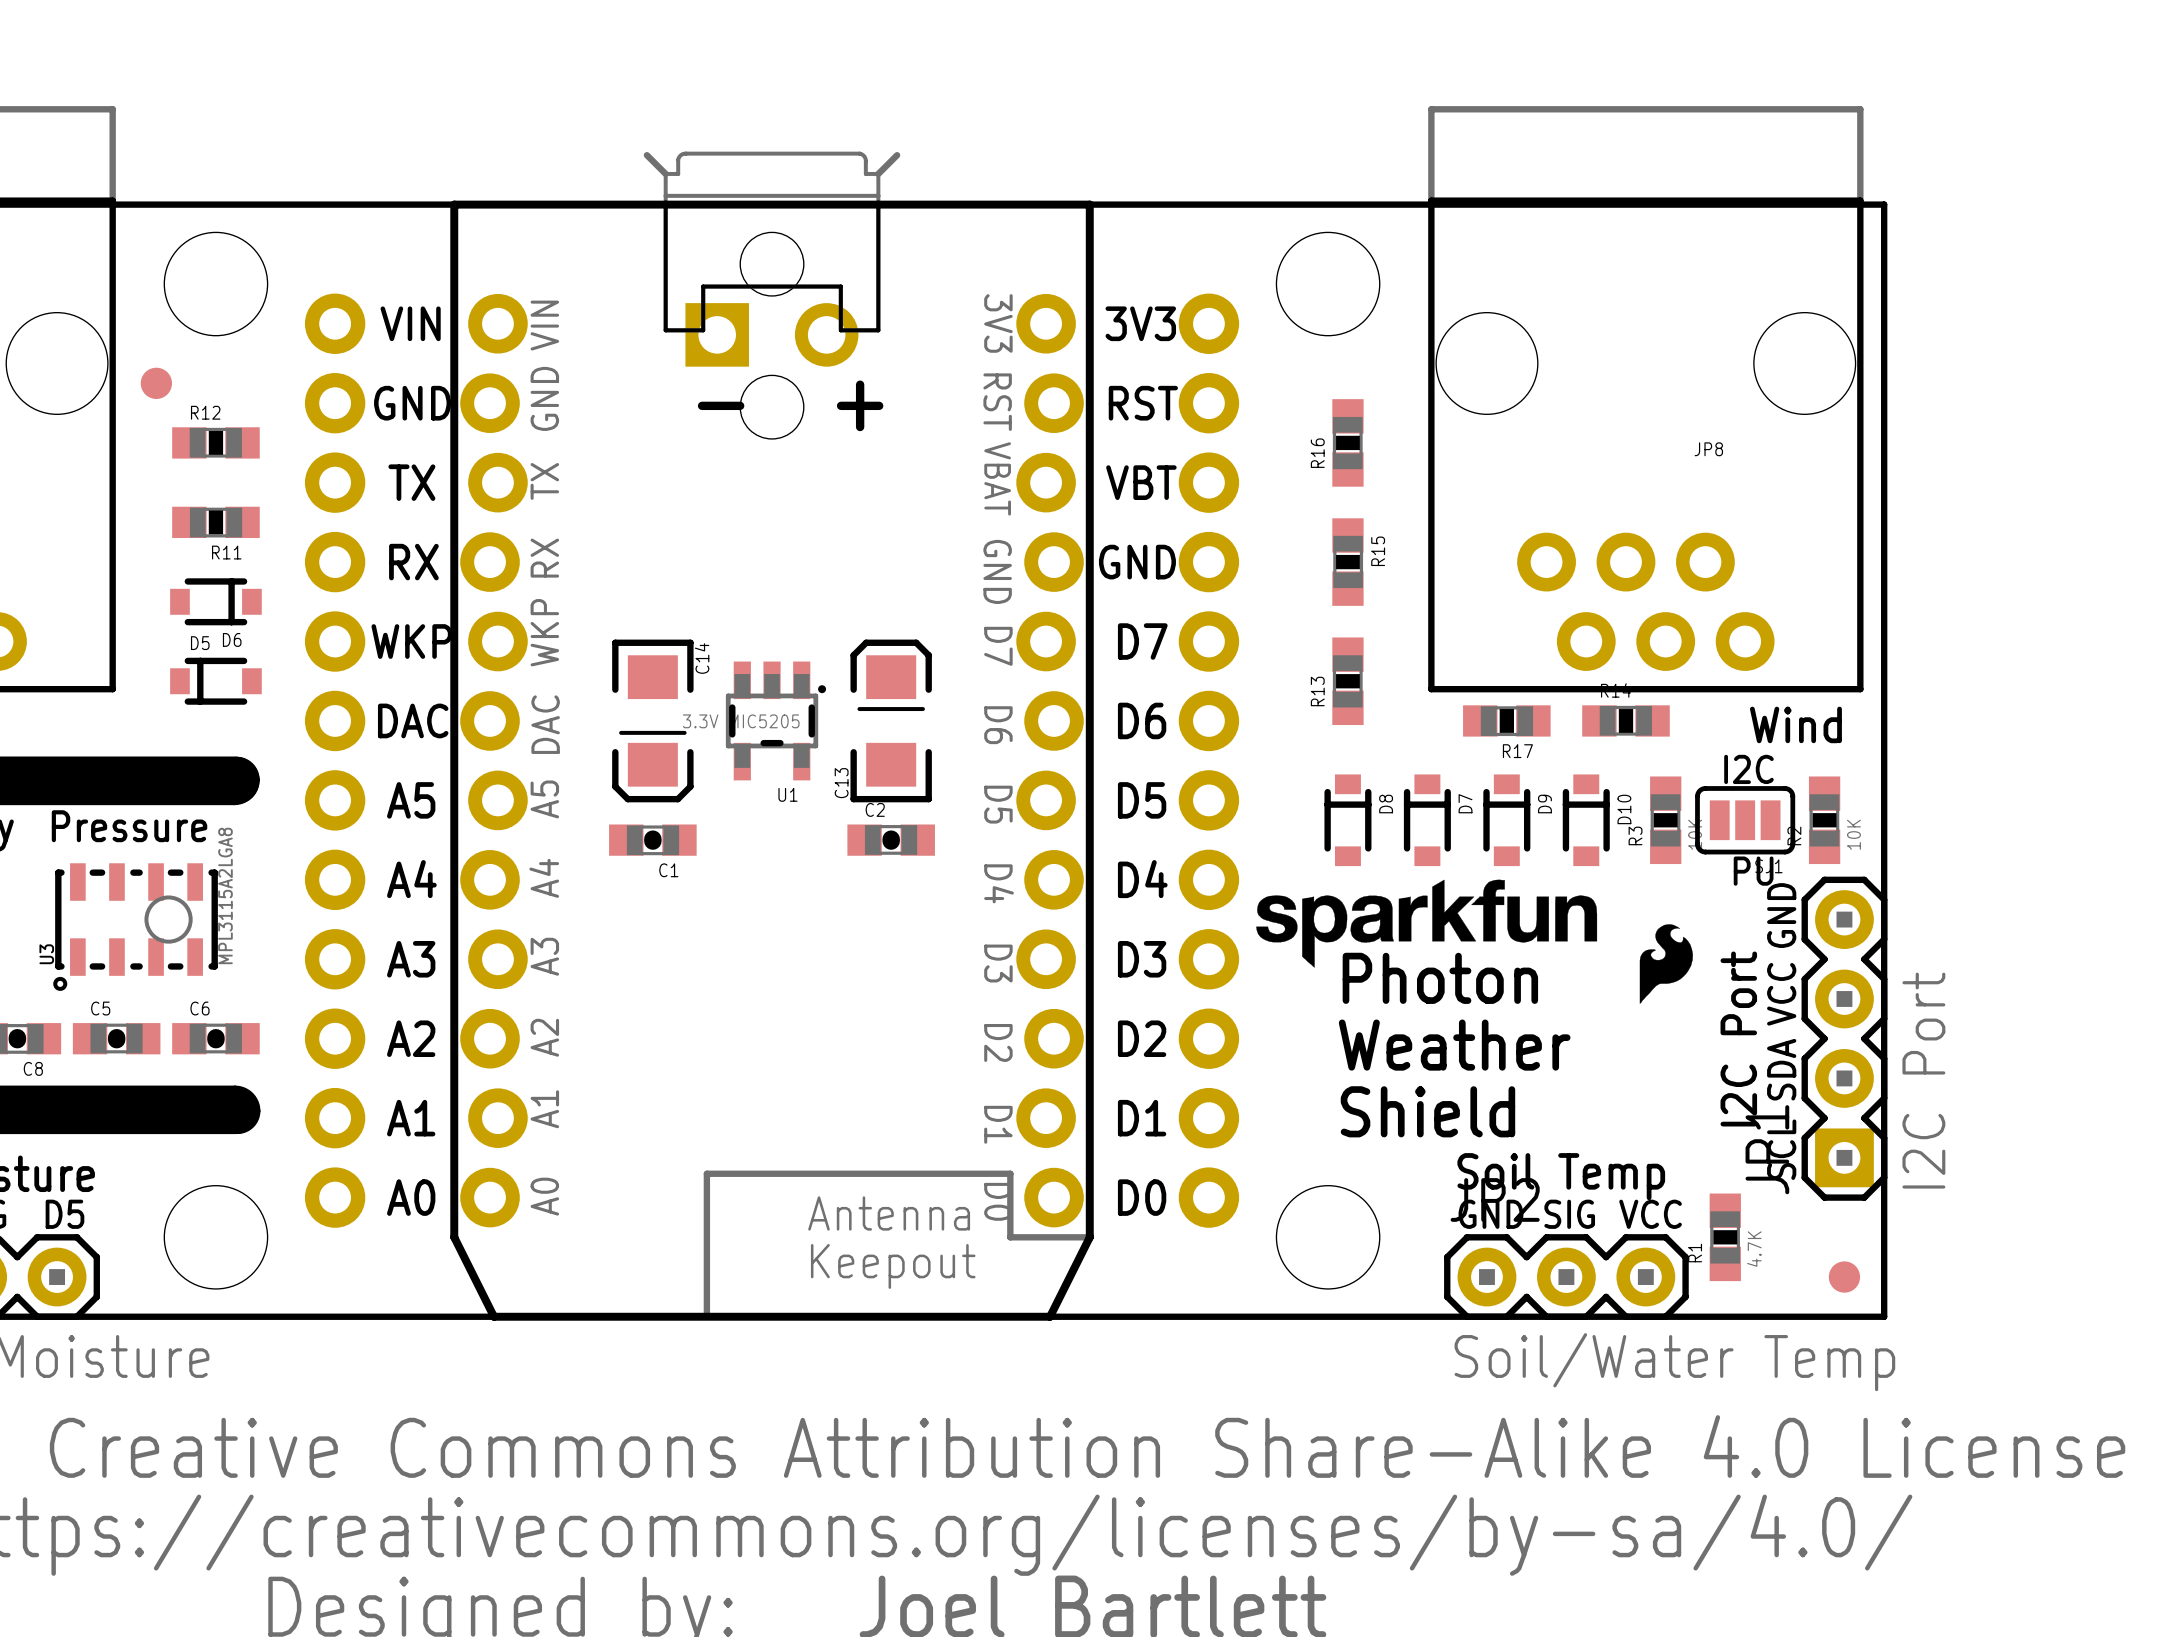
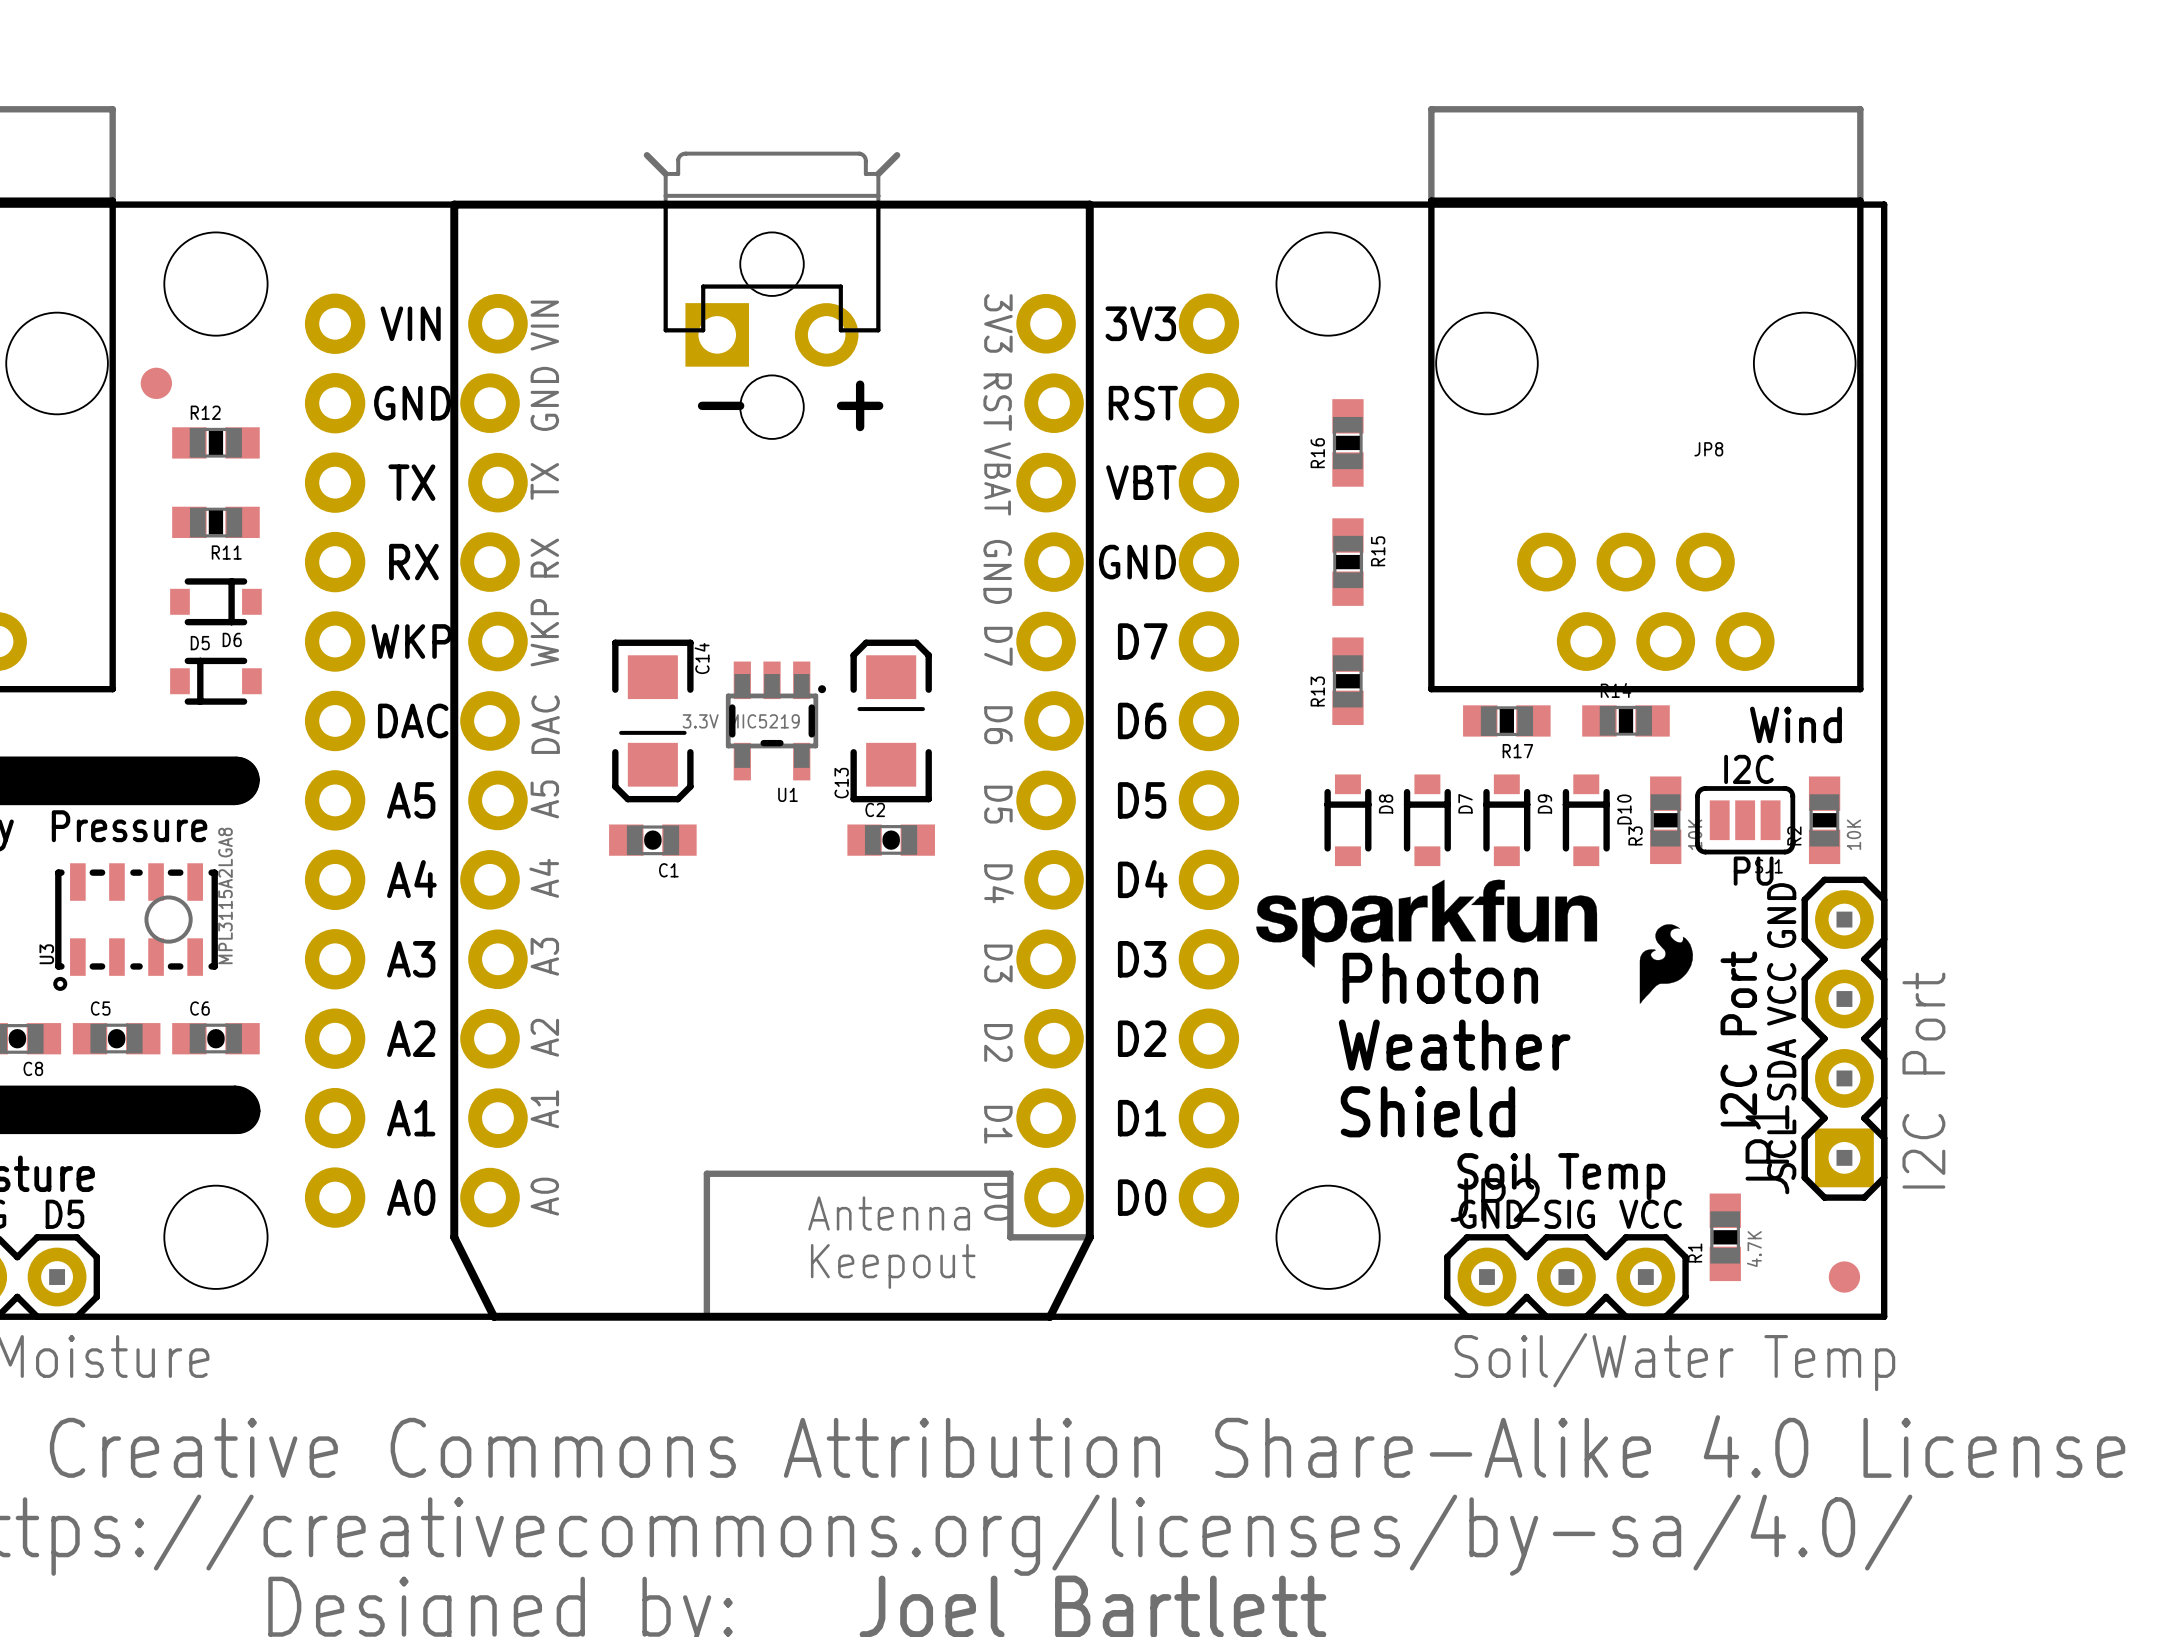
U1 value: 3.3V MIC5205 (741, 721) -> 3.3V MIC5219 (741, 721)

